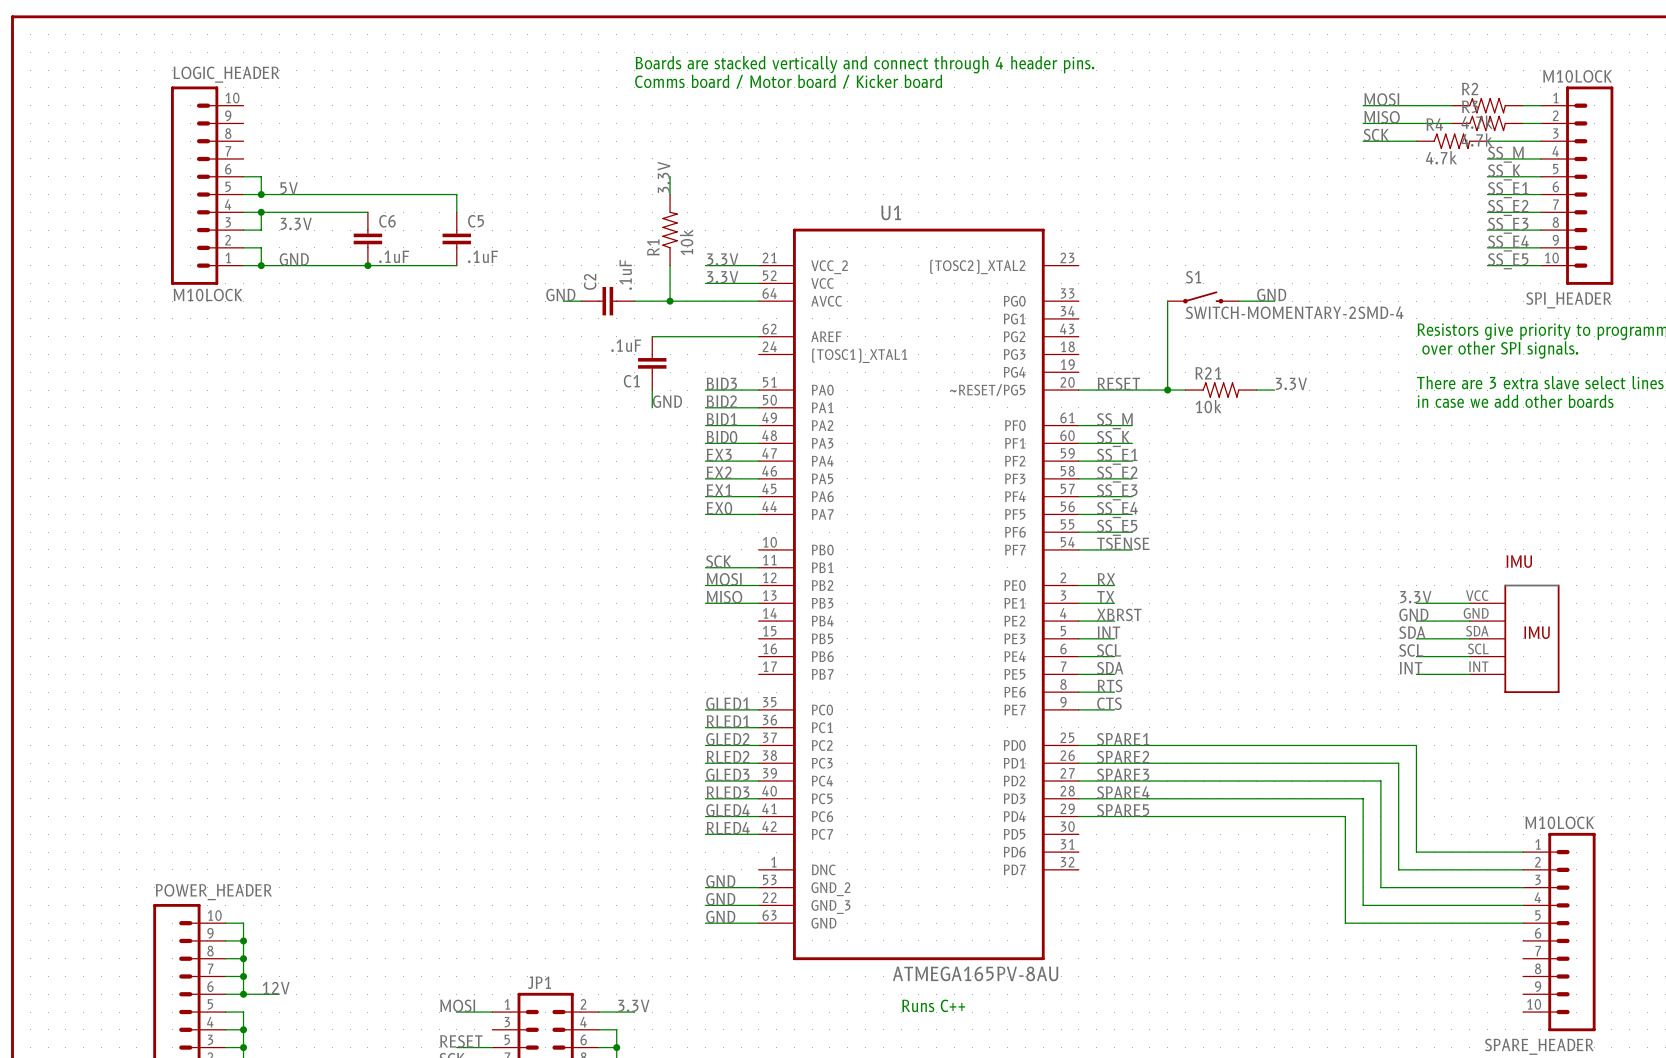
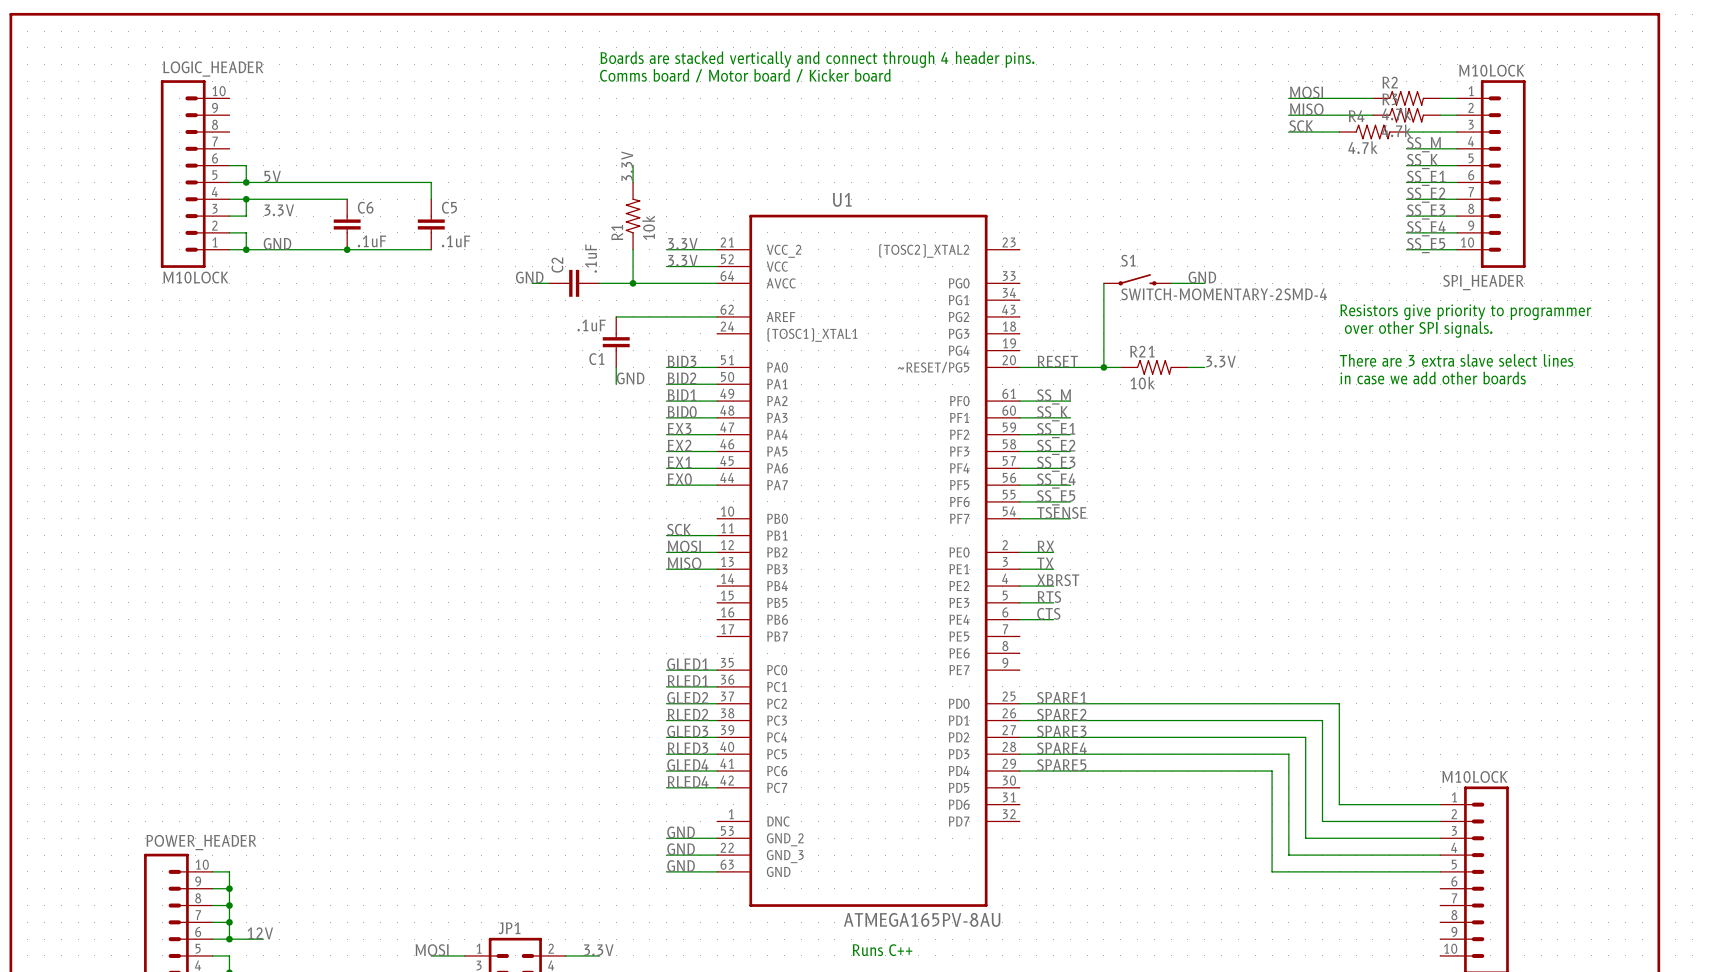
label: 3.3V (1415, 597) -> none
wire: (1416, 603) (1469, 603) -> none
label: GND (1413, 614) -> none
wire: (1416, 621) (1469, 621) -> none
label: INT (1108, 632) -> RTS (1049, 597)
label: SDA (1412, 632) -> none
wire: (1416, 638) (1469, 638) -> none
IMU: (1514, 638) -> none
label: SCL (1109, 650) -> CTS (1048, 613)
label: SCL (1411, 650) -> none
wire: (1416, 656) (1469, 656) -> none
label: SDA (1110, 668) -> none
label: INT (1411, 668) -> none
wire: (1078, 674) (1114, 674) -> none
wire: (1416, 674) (1469, 674) -> none
label: RTS (1110, 686) -> none
wire: (1078, 692) (1114, 692) -> none
label: CTS (1109, 703) -> none
wire: (1078, 709) (1114, 709) -> none

